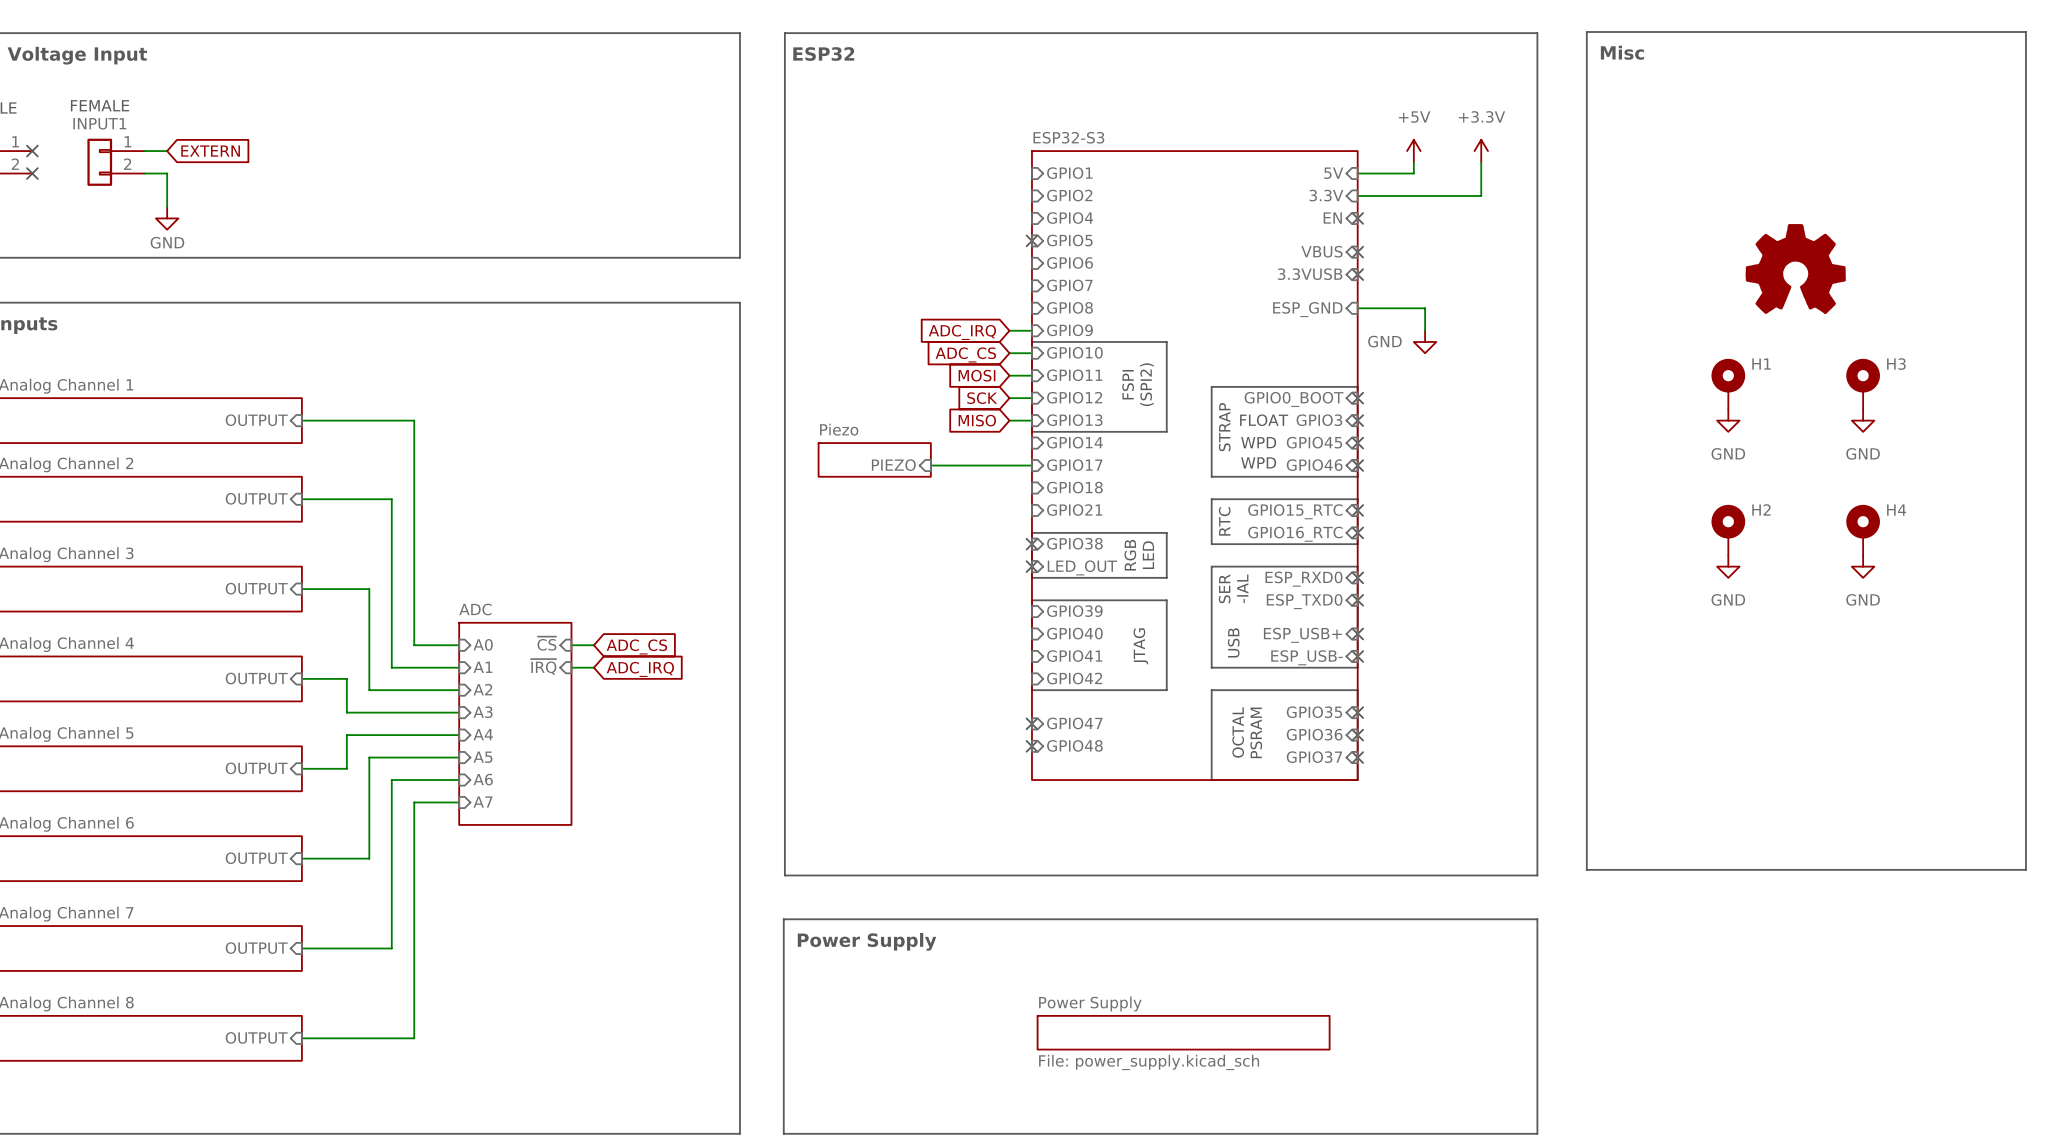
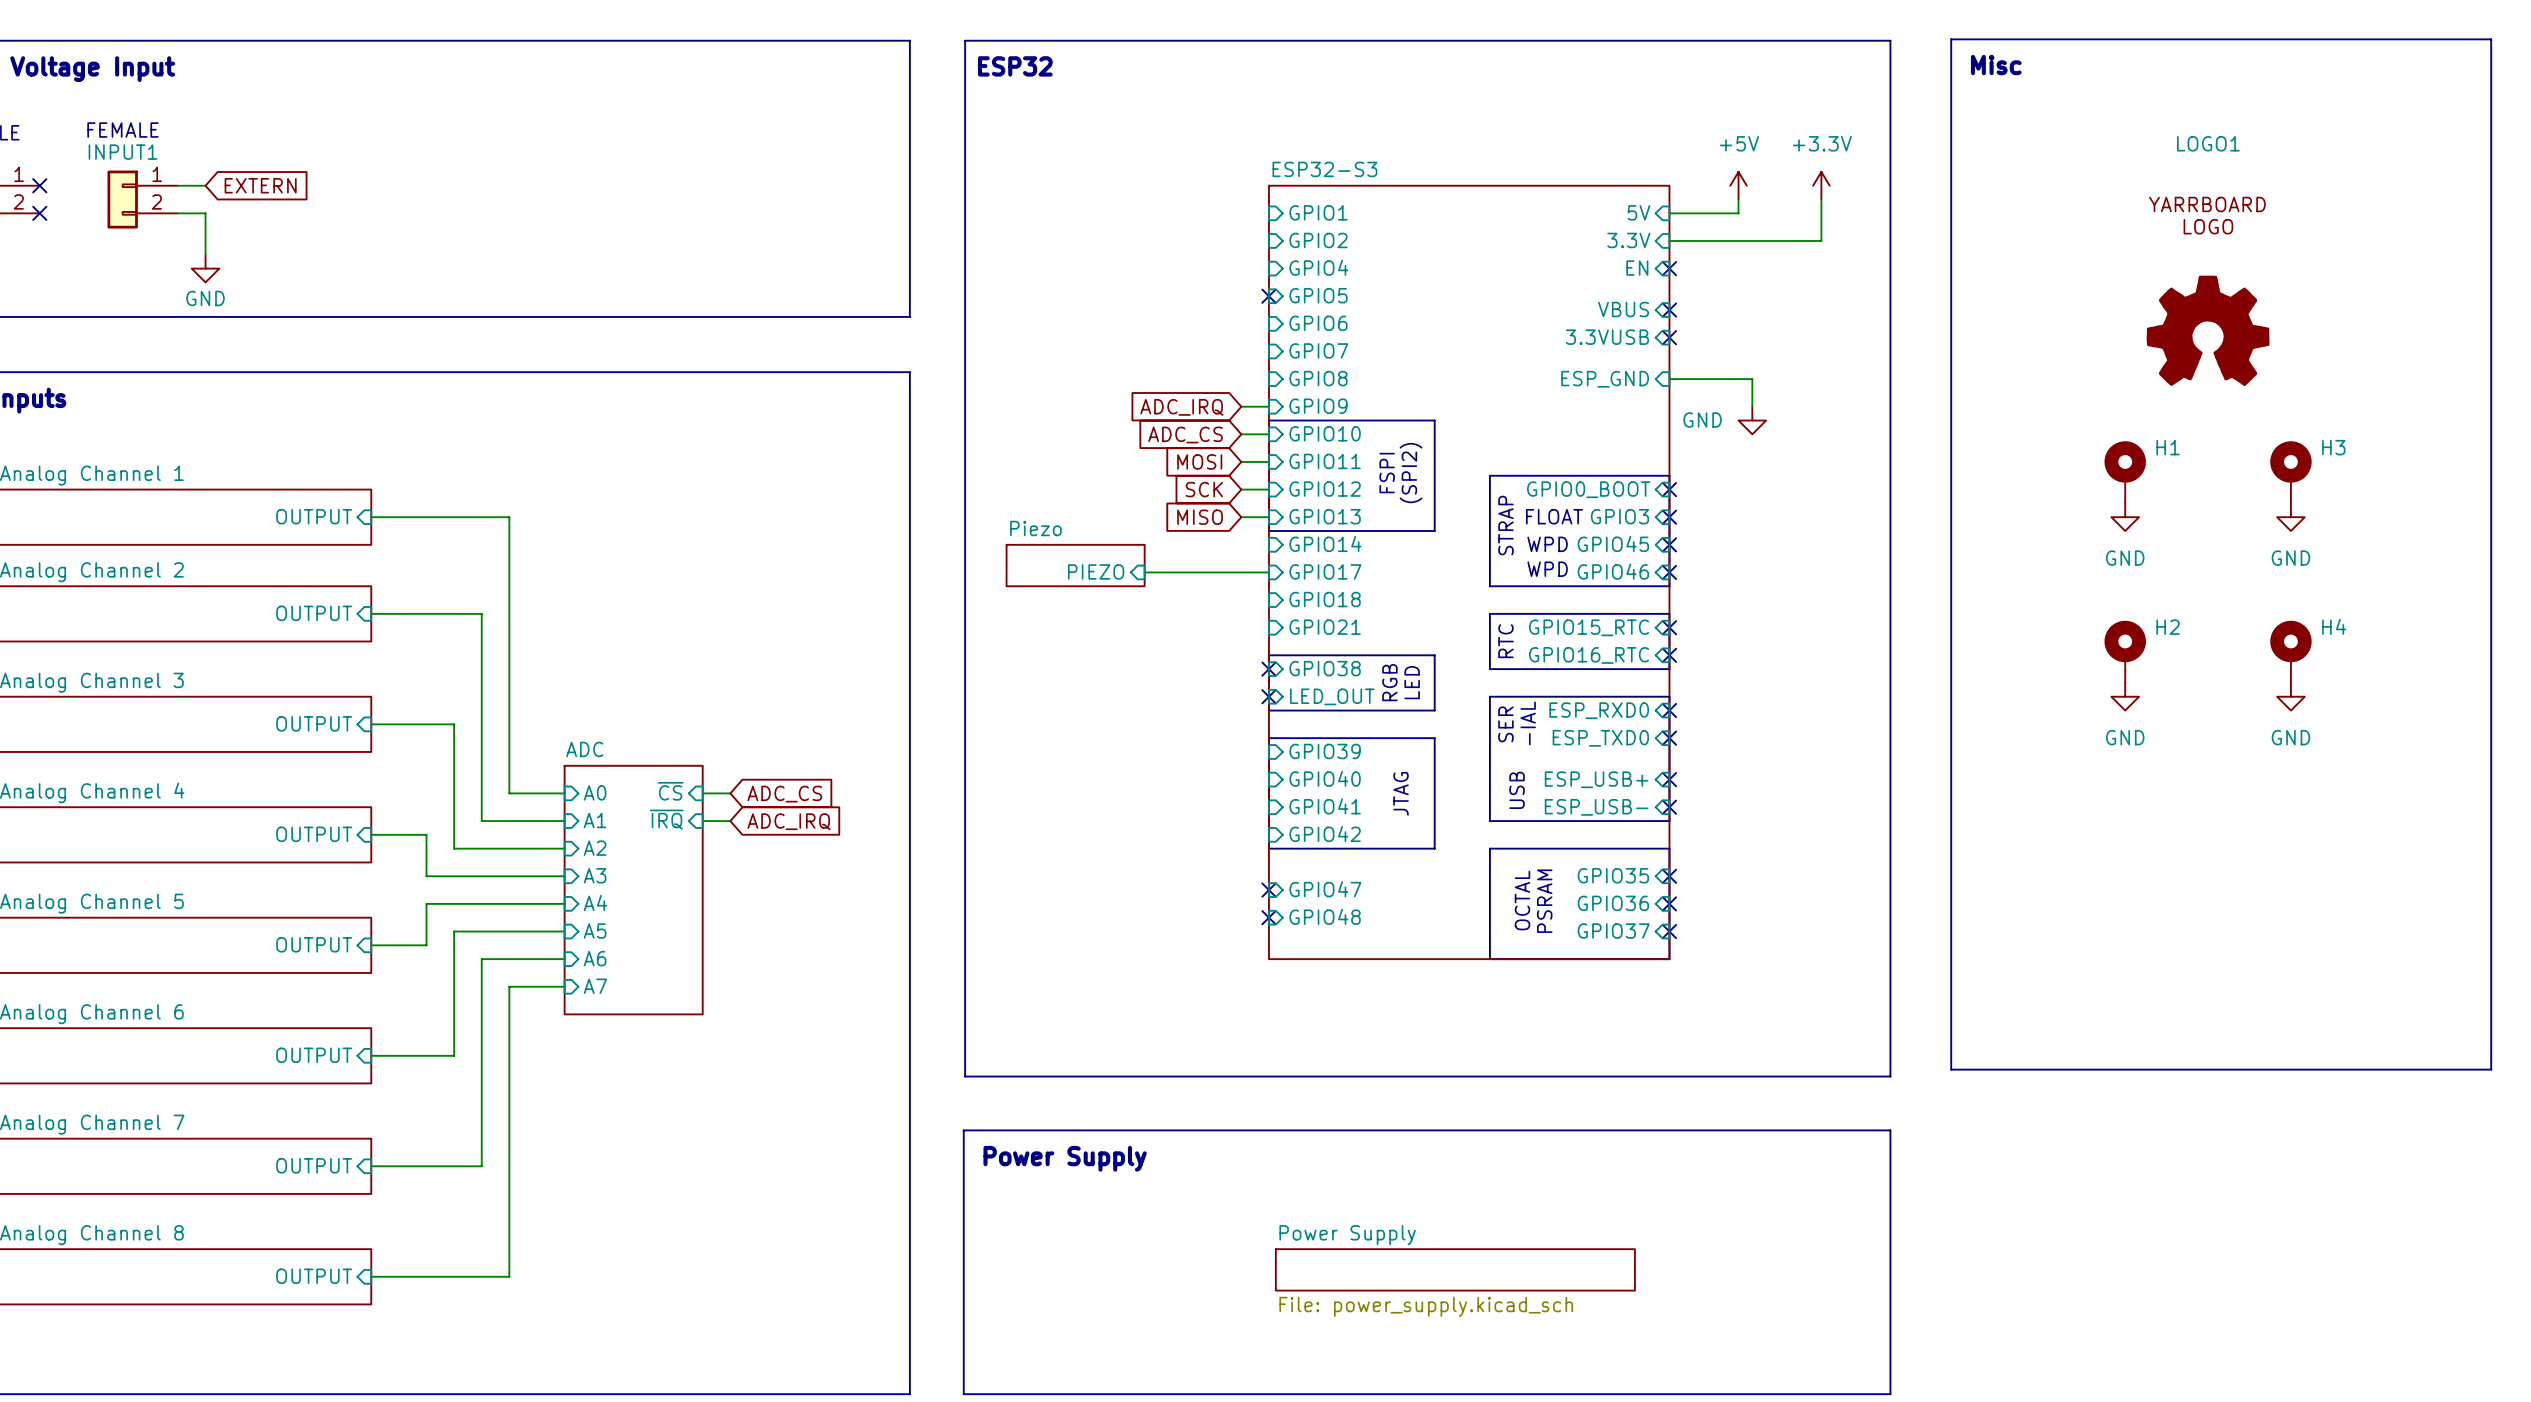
LOGO1: none -> (2207, 185)

